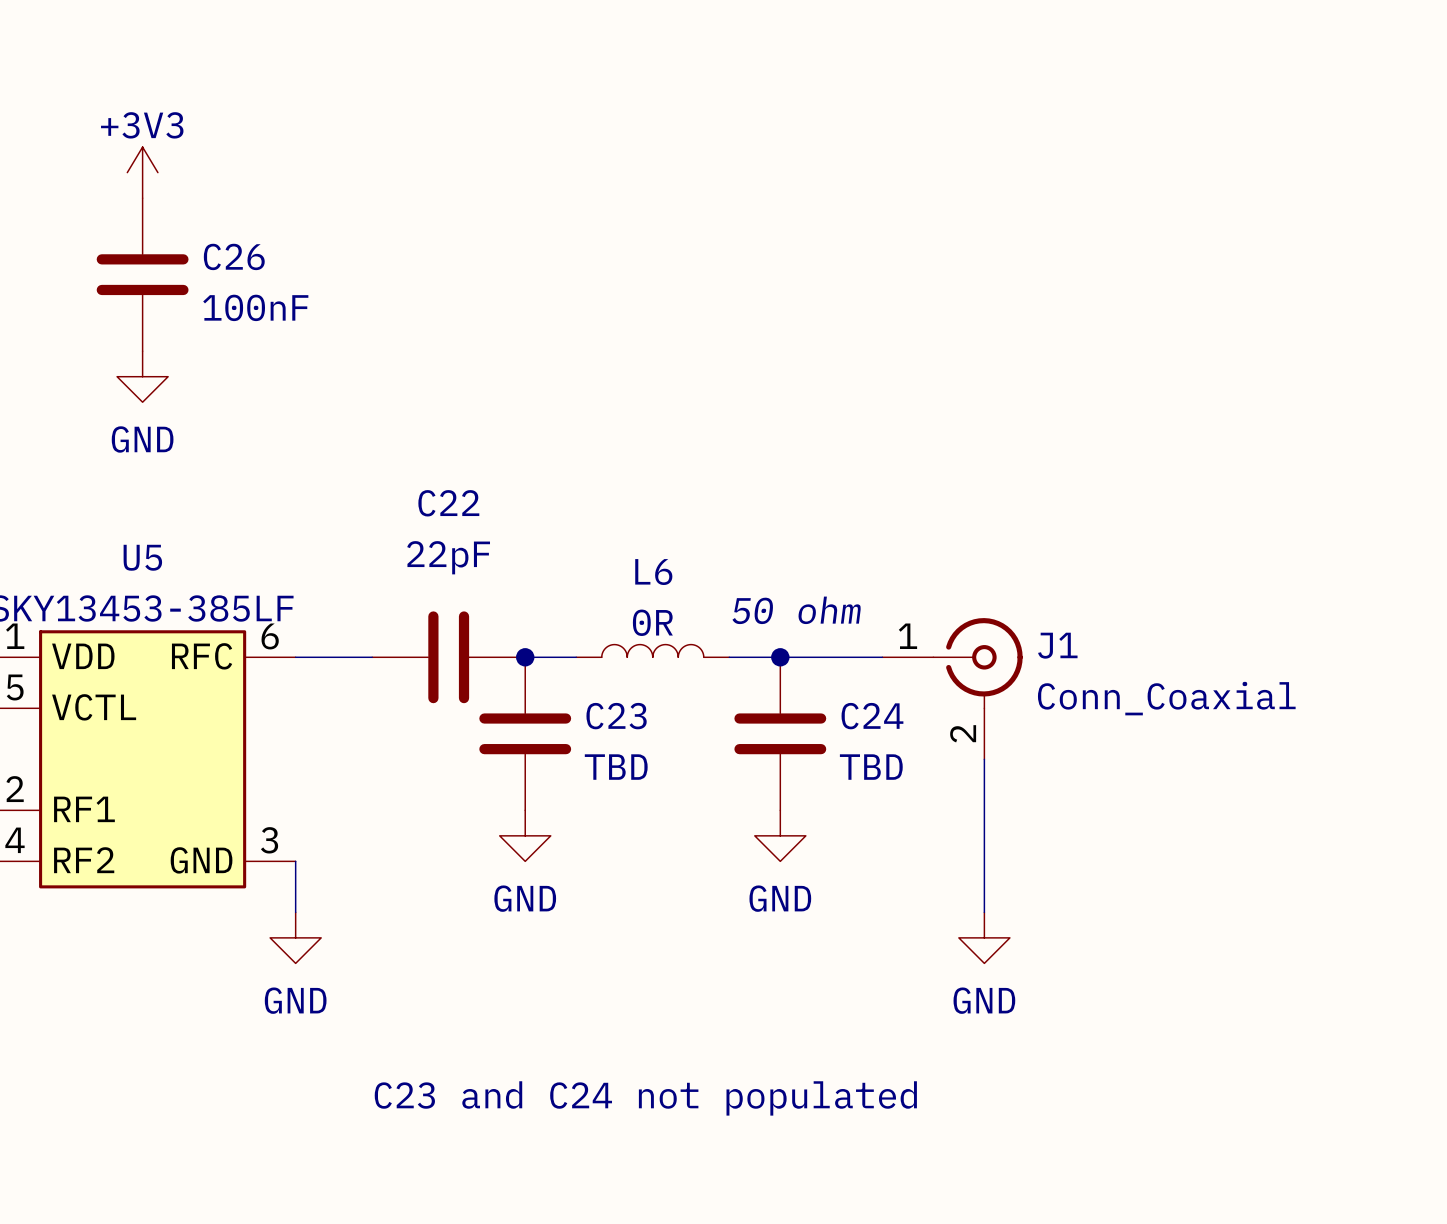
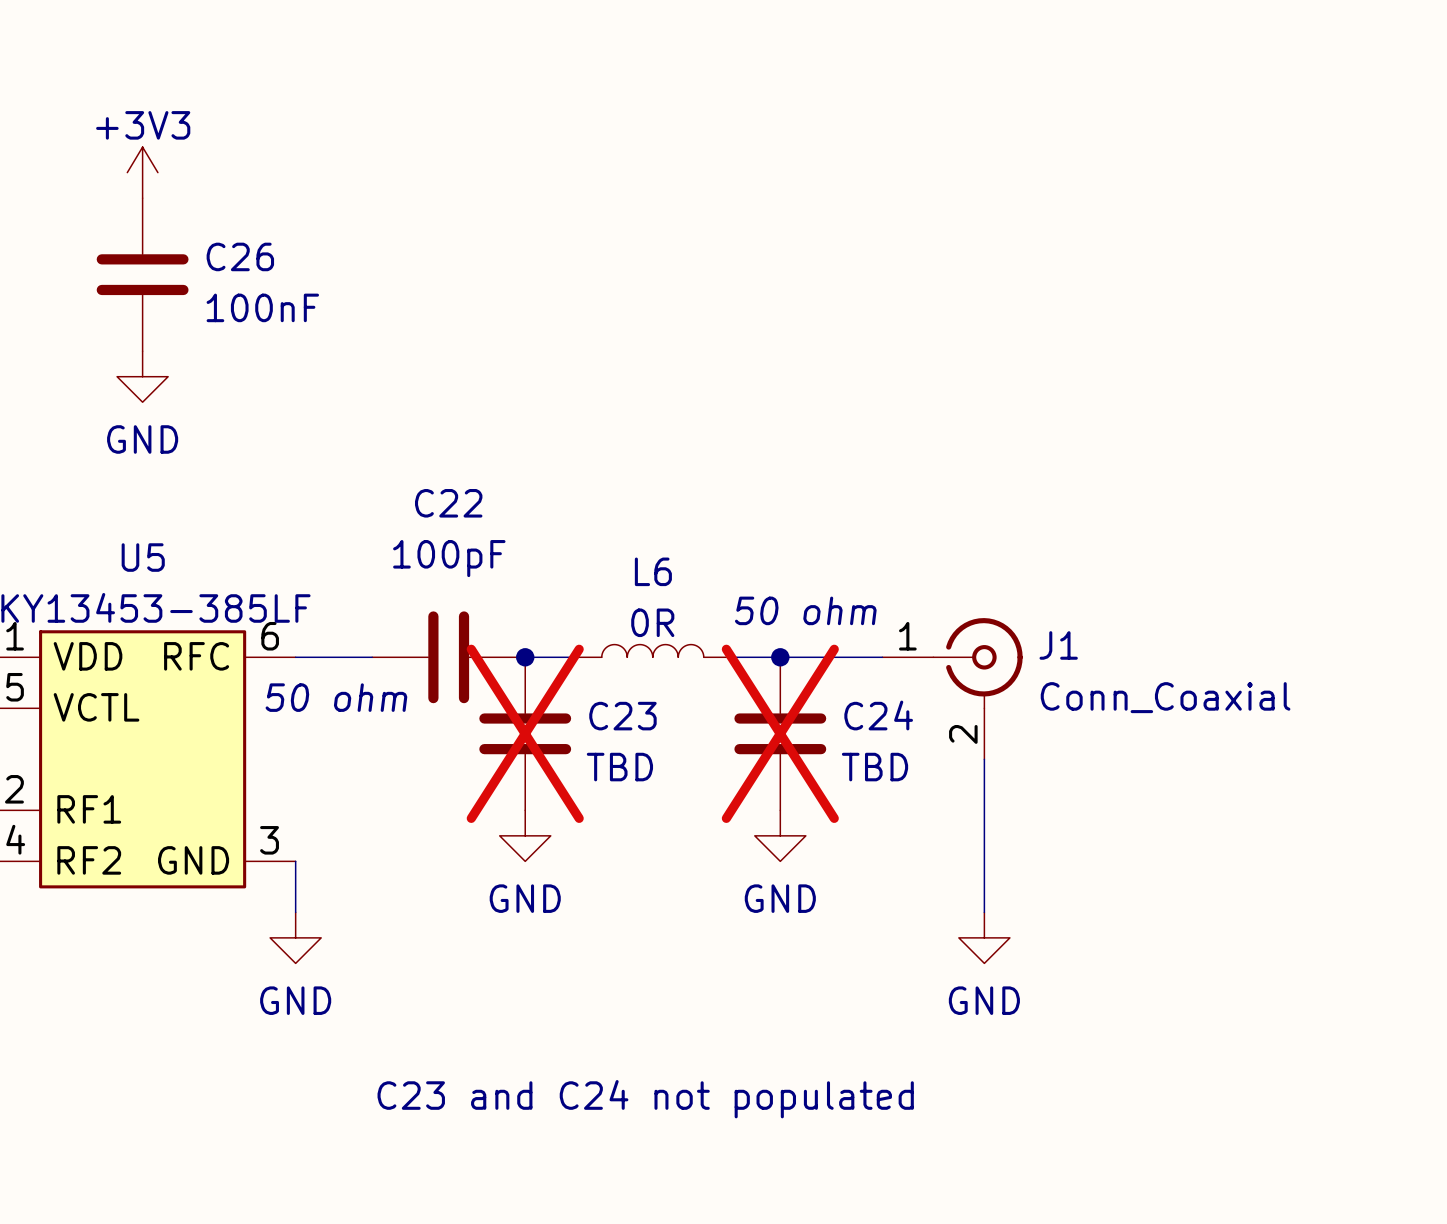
C22 value: 22pF (448, 557) -> 100pF (449, 558)
text: none -> 50 ohm (336, 697)
C23 do-not-place cross: none -> (525, 733)
C24 do-not-place cross: none -> (780, 733)

